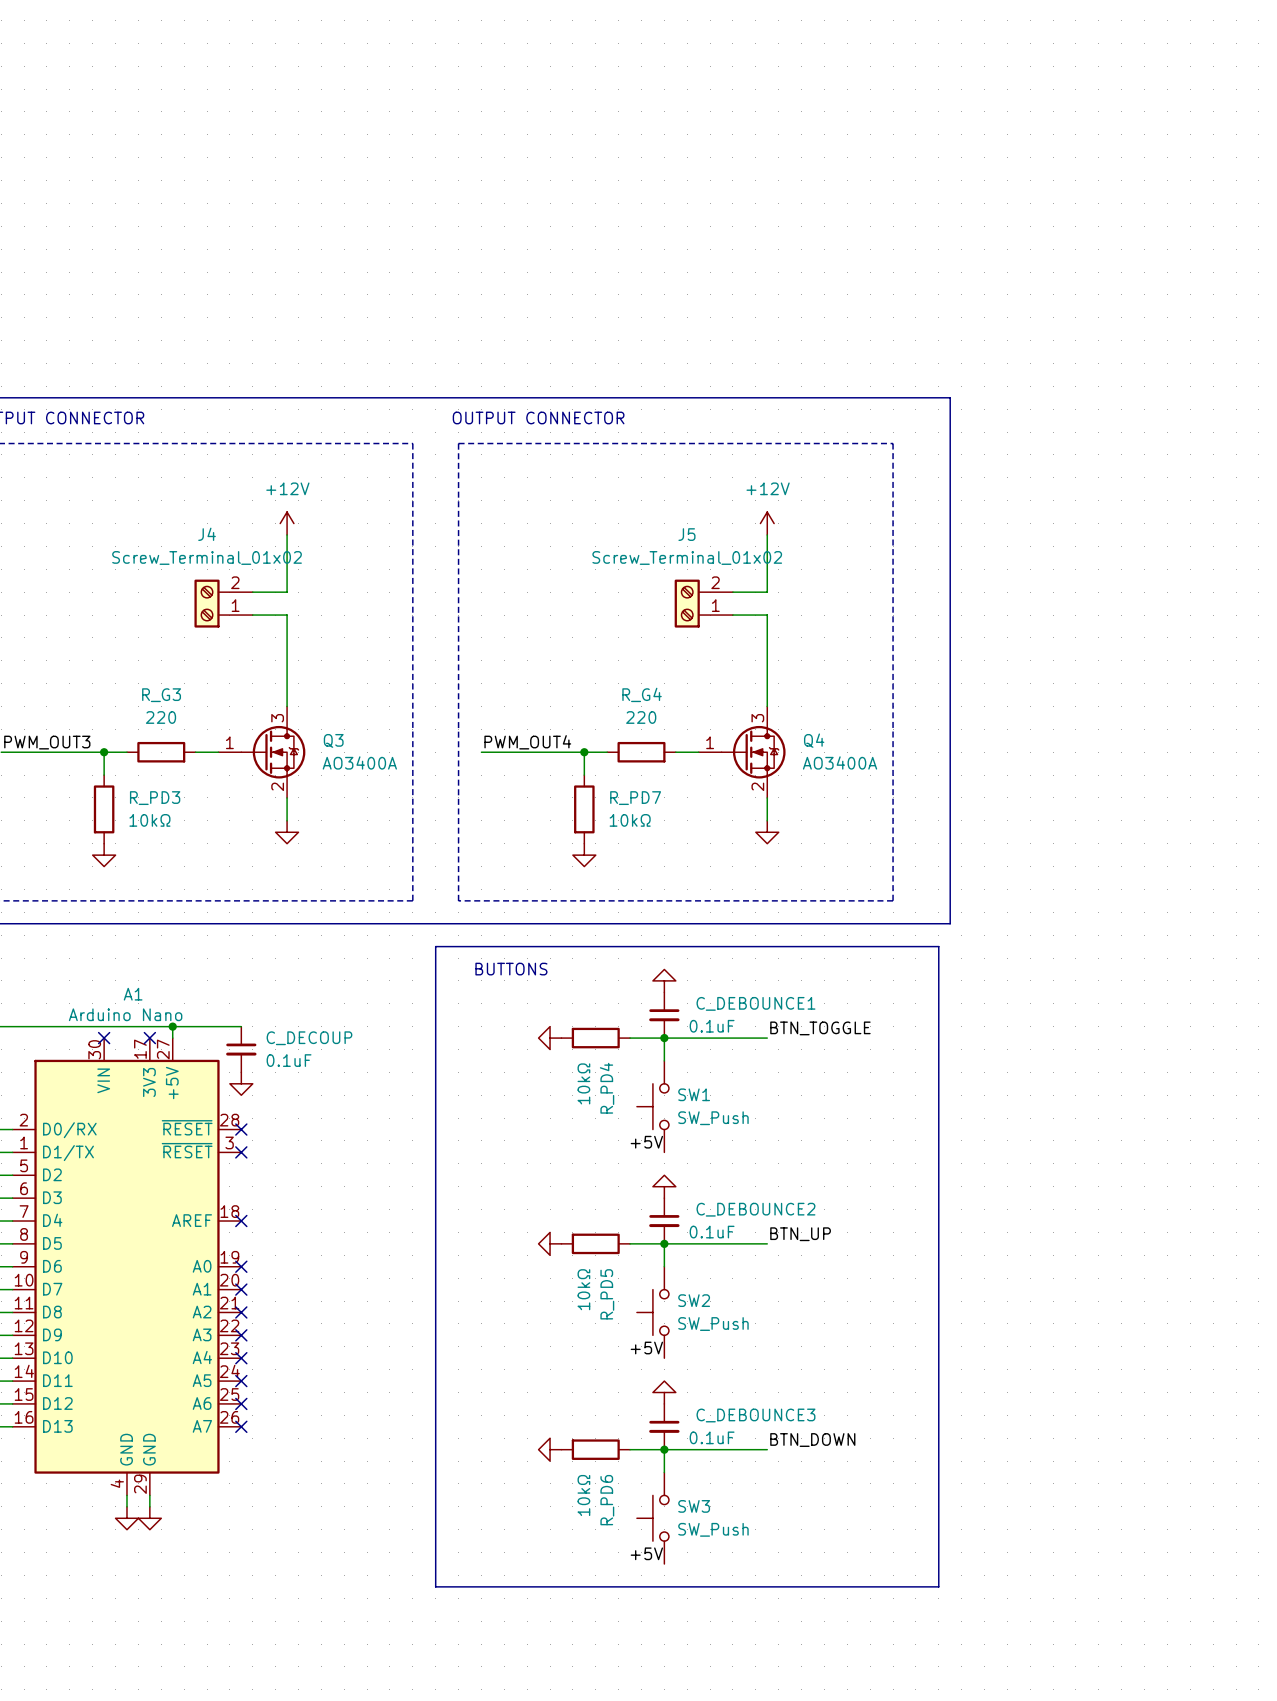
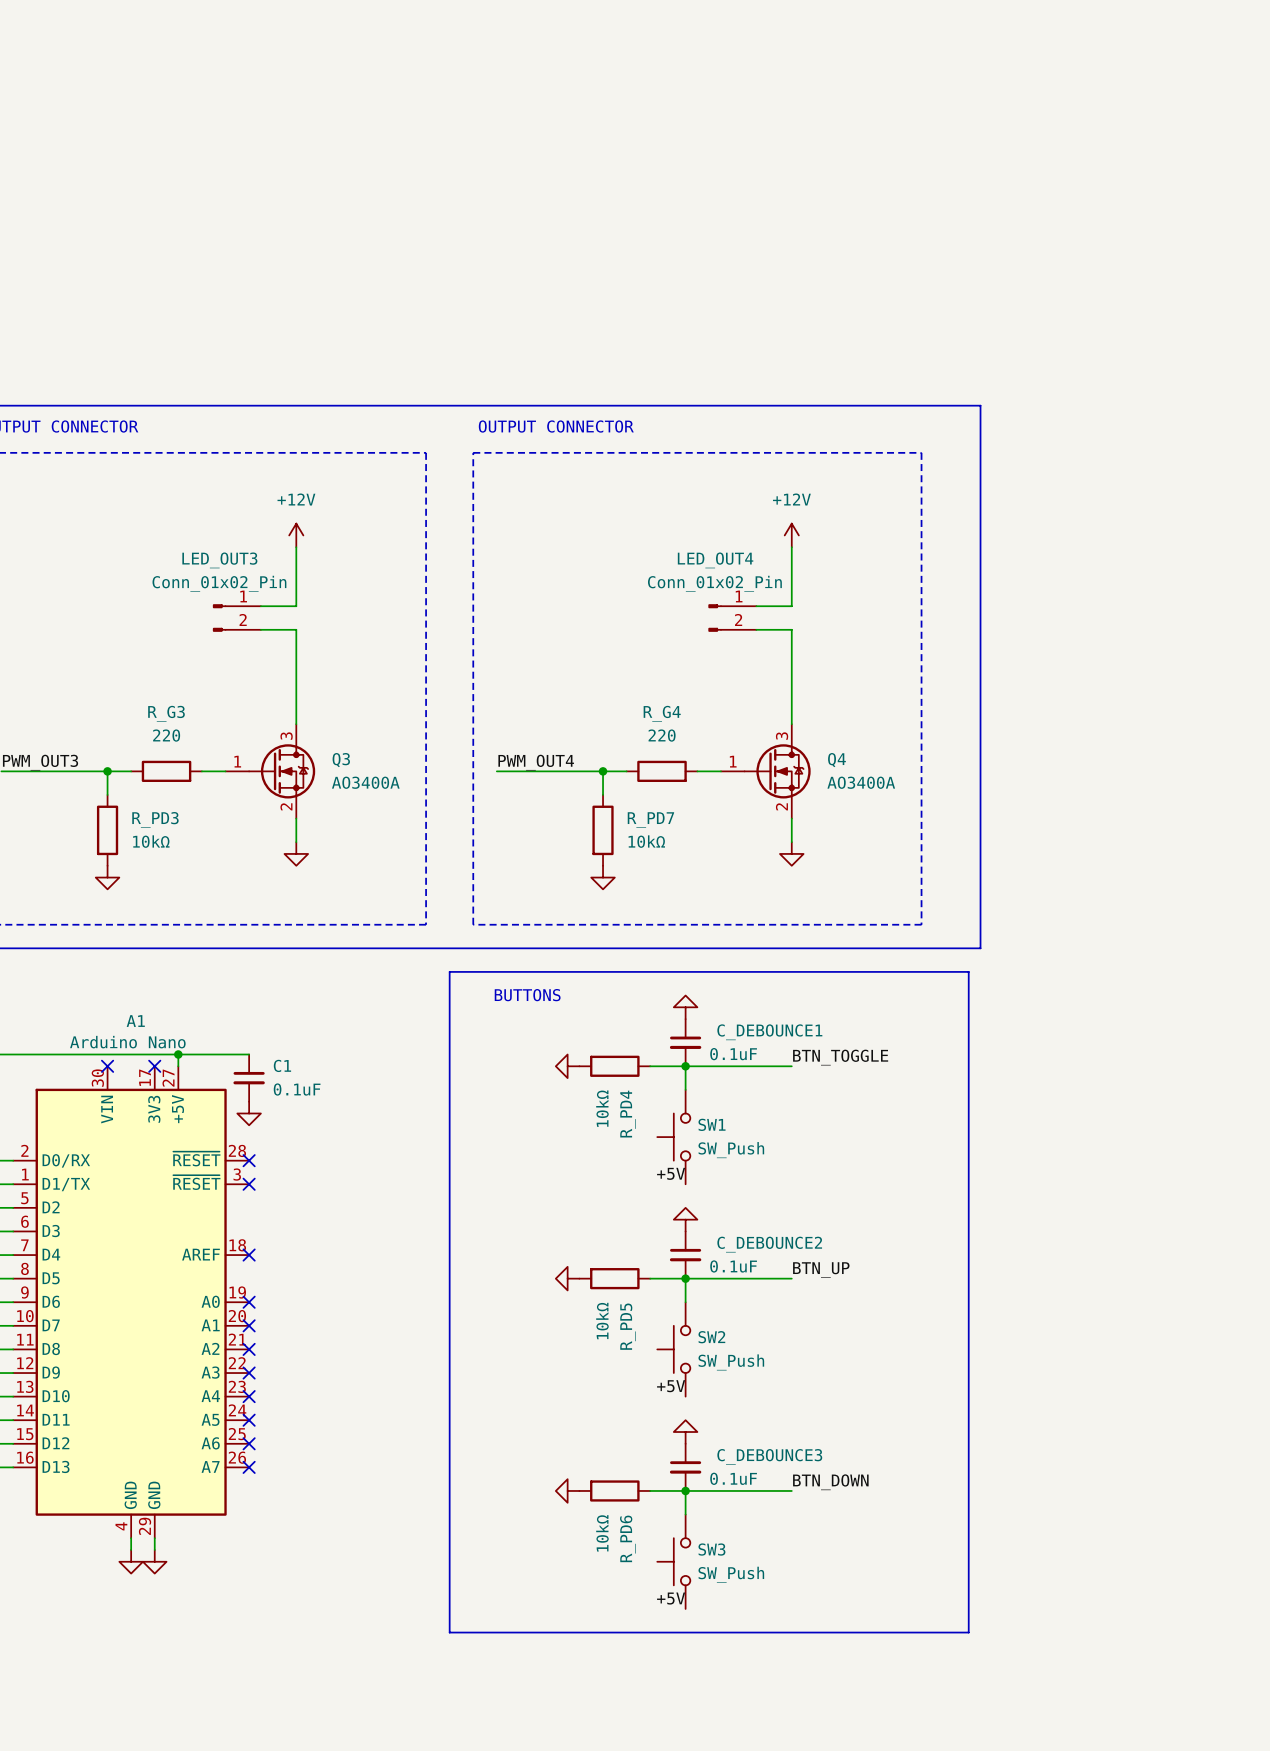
J4: Screw_Terminal_01x02 (223, 603) -> none
LED_OUT3: none -> Conn_01x02_Pin (236, 618)
J5: Screw_Terminal_01x02 (703, 603) -> none
LED_OUT4: none -> Conn_01x02_Pin (732, 618)
C_DECOUP name: C_DECOUP (309, 1038) -> C1 (282, 1065)

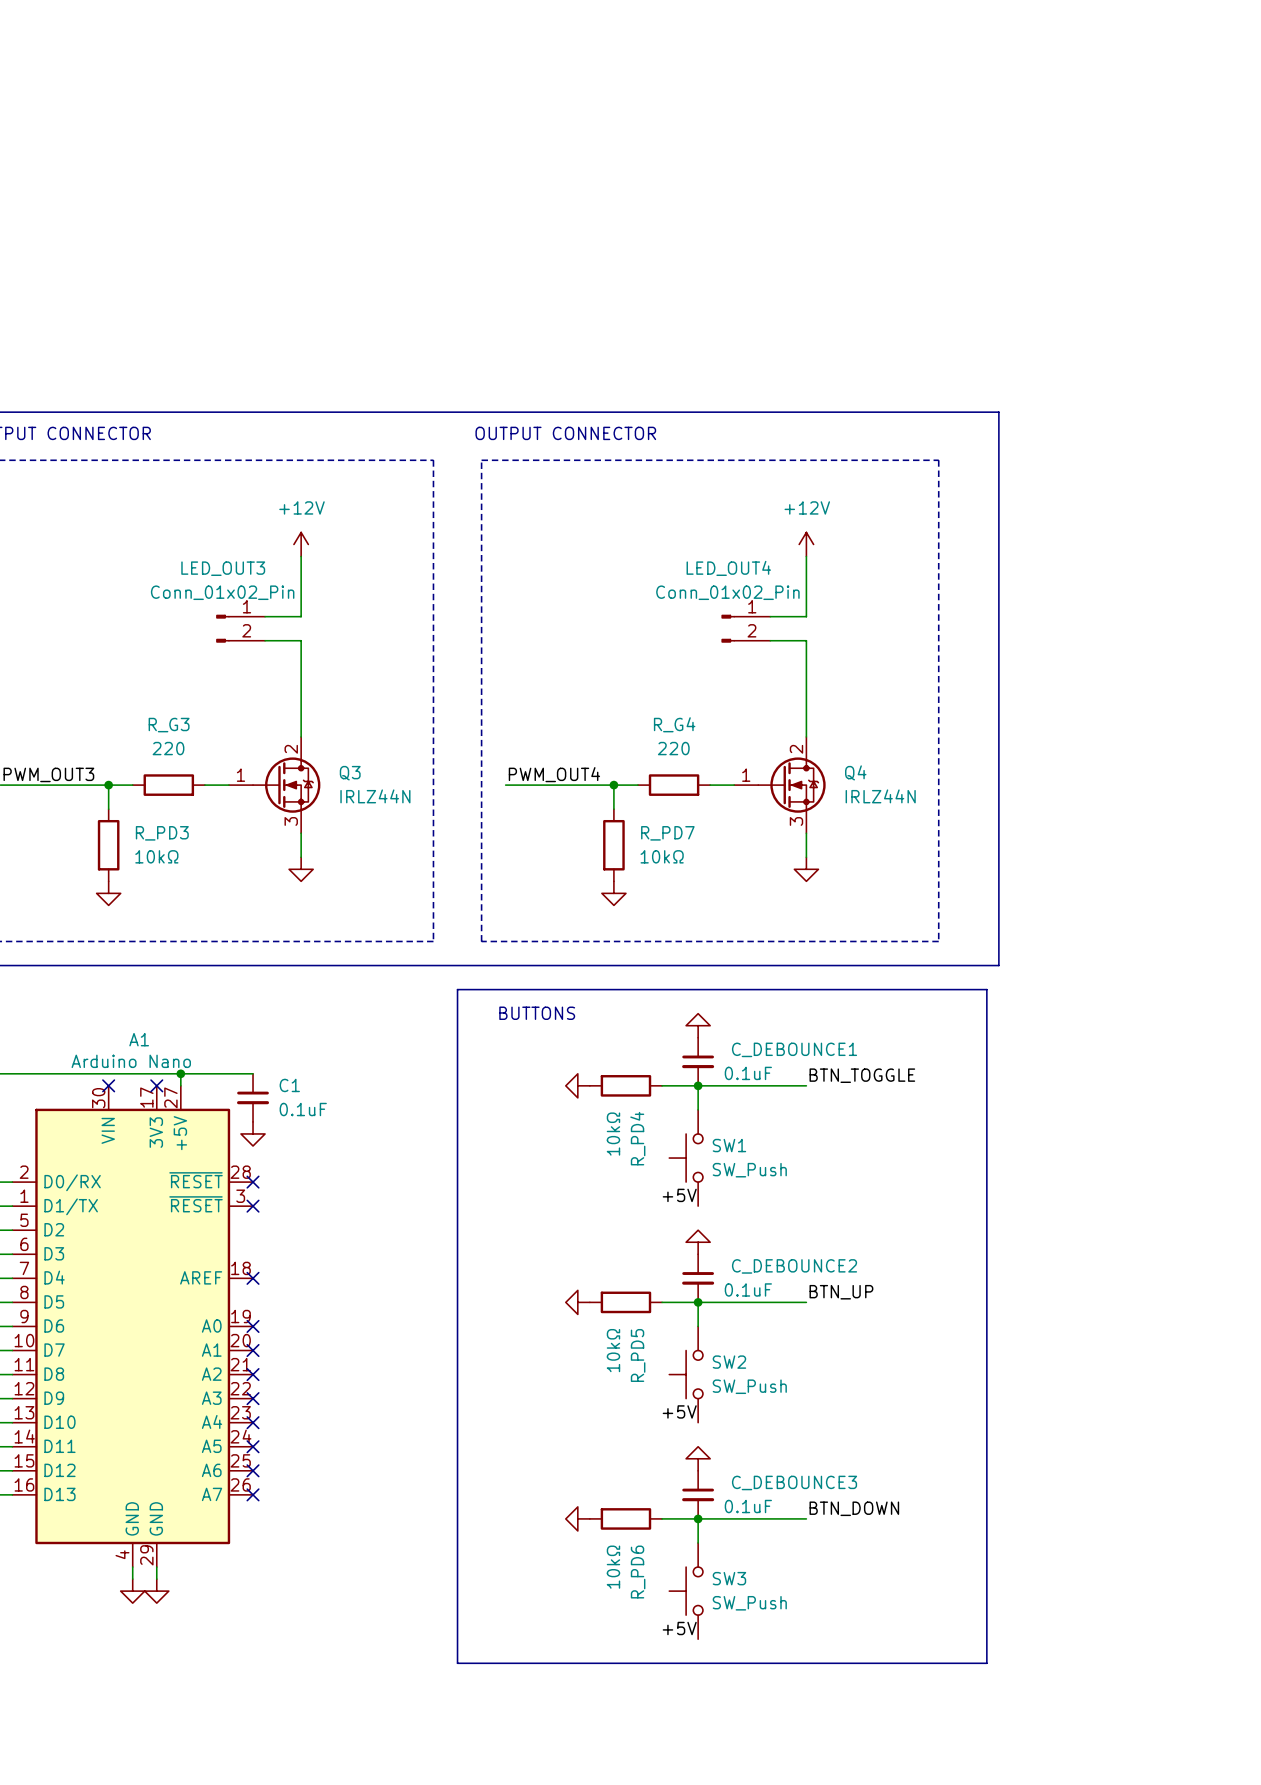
Q3 pin number: 3 (286, 736) -> 2 (291, 749)
Q4 pin number: 3 (782, 736) -> 2 (796, 749)
Q3 value: AO3400A (365, 782) -> IRLZ44N (375, 796)
Q4 value: AO3400A (861, 782) -> IRLZ44N (880, 796)
Q3 pin number: 2 (286, 806) -> 3 (291, 821)
Q4 pin number: 2 (781, 806) -> 3 (796, 821)

